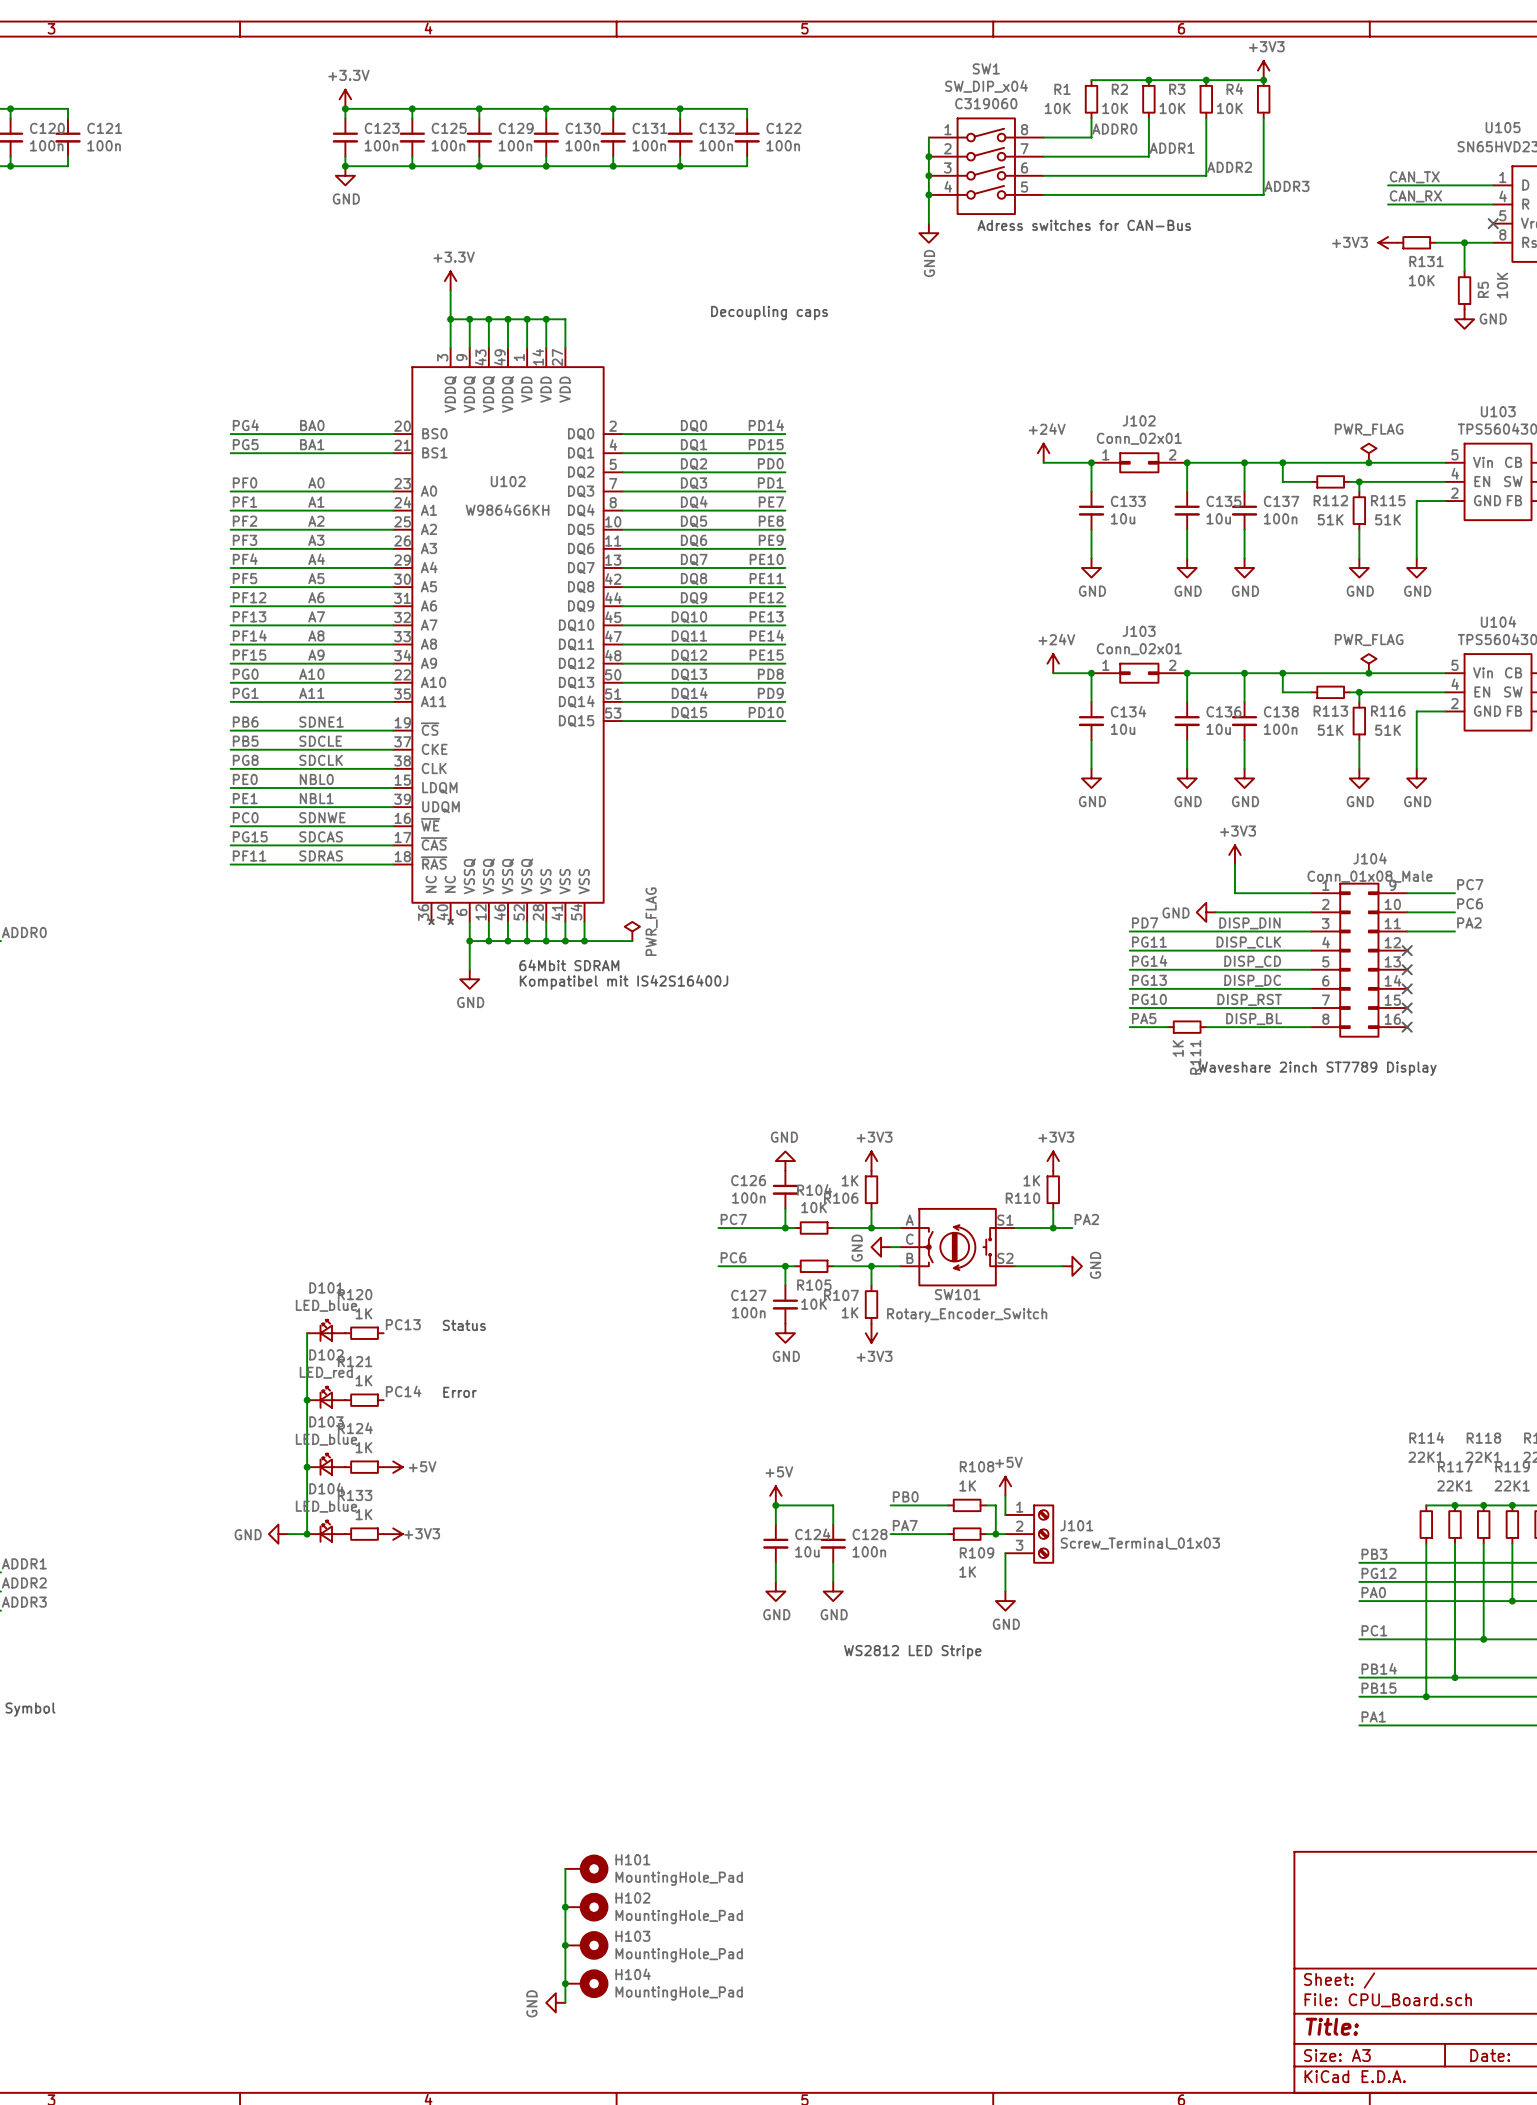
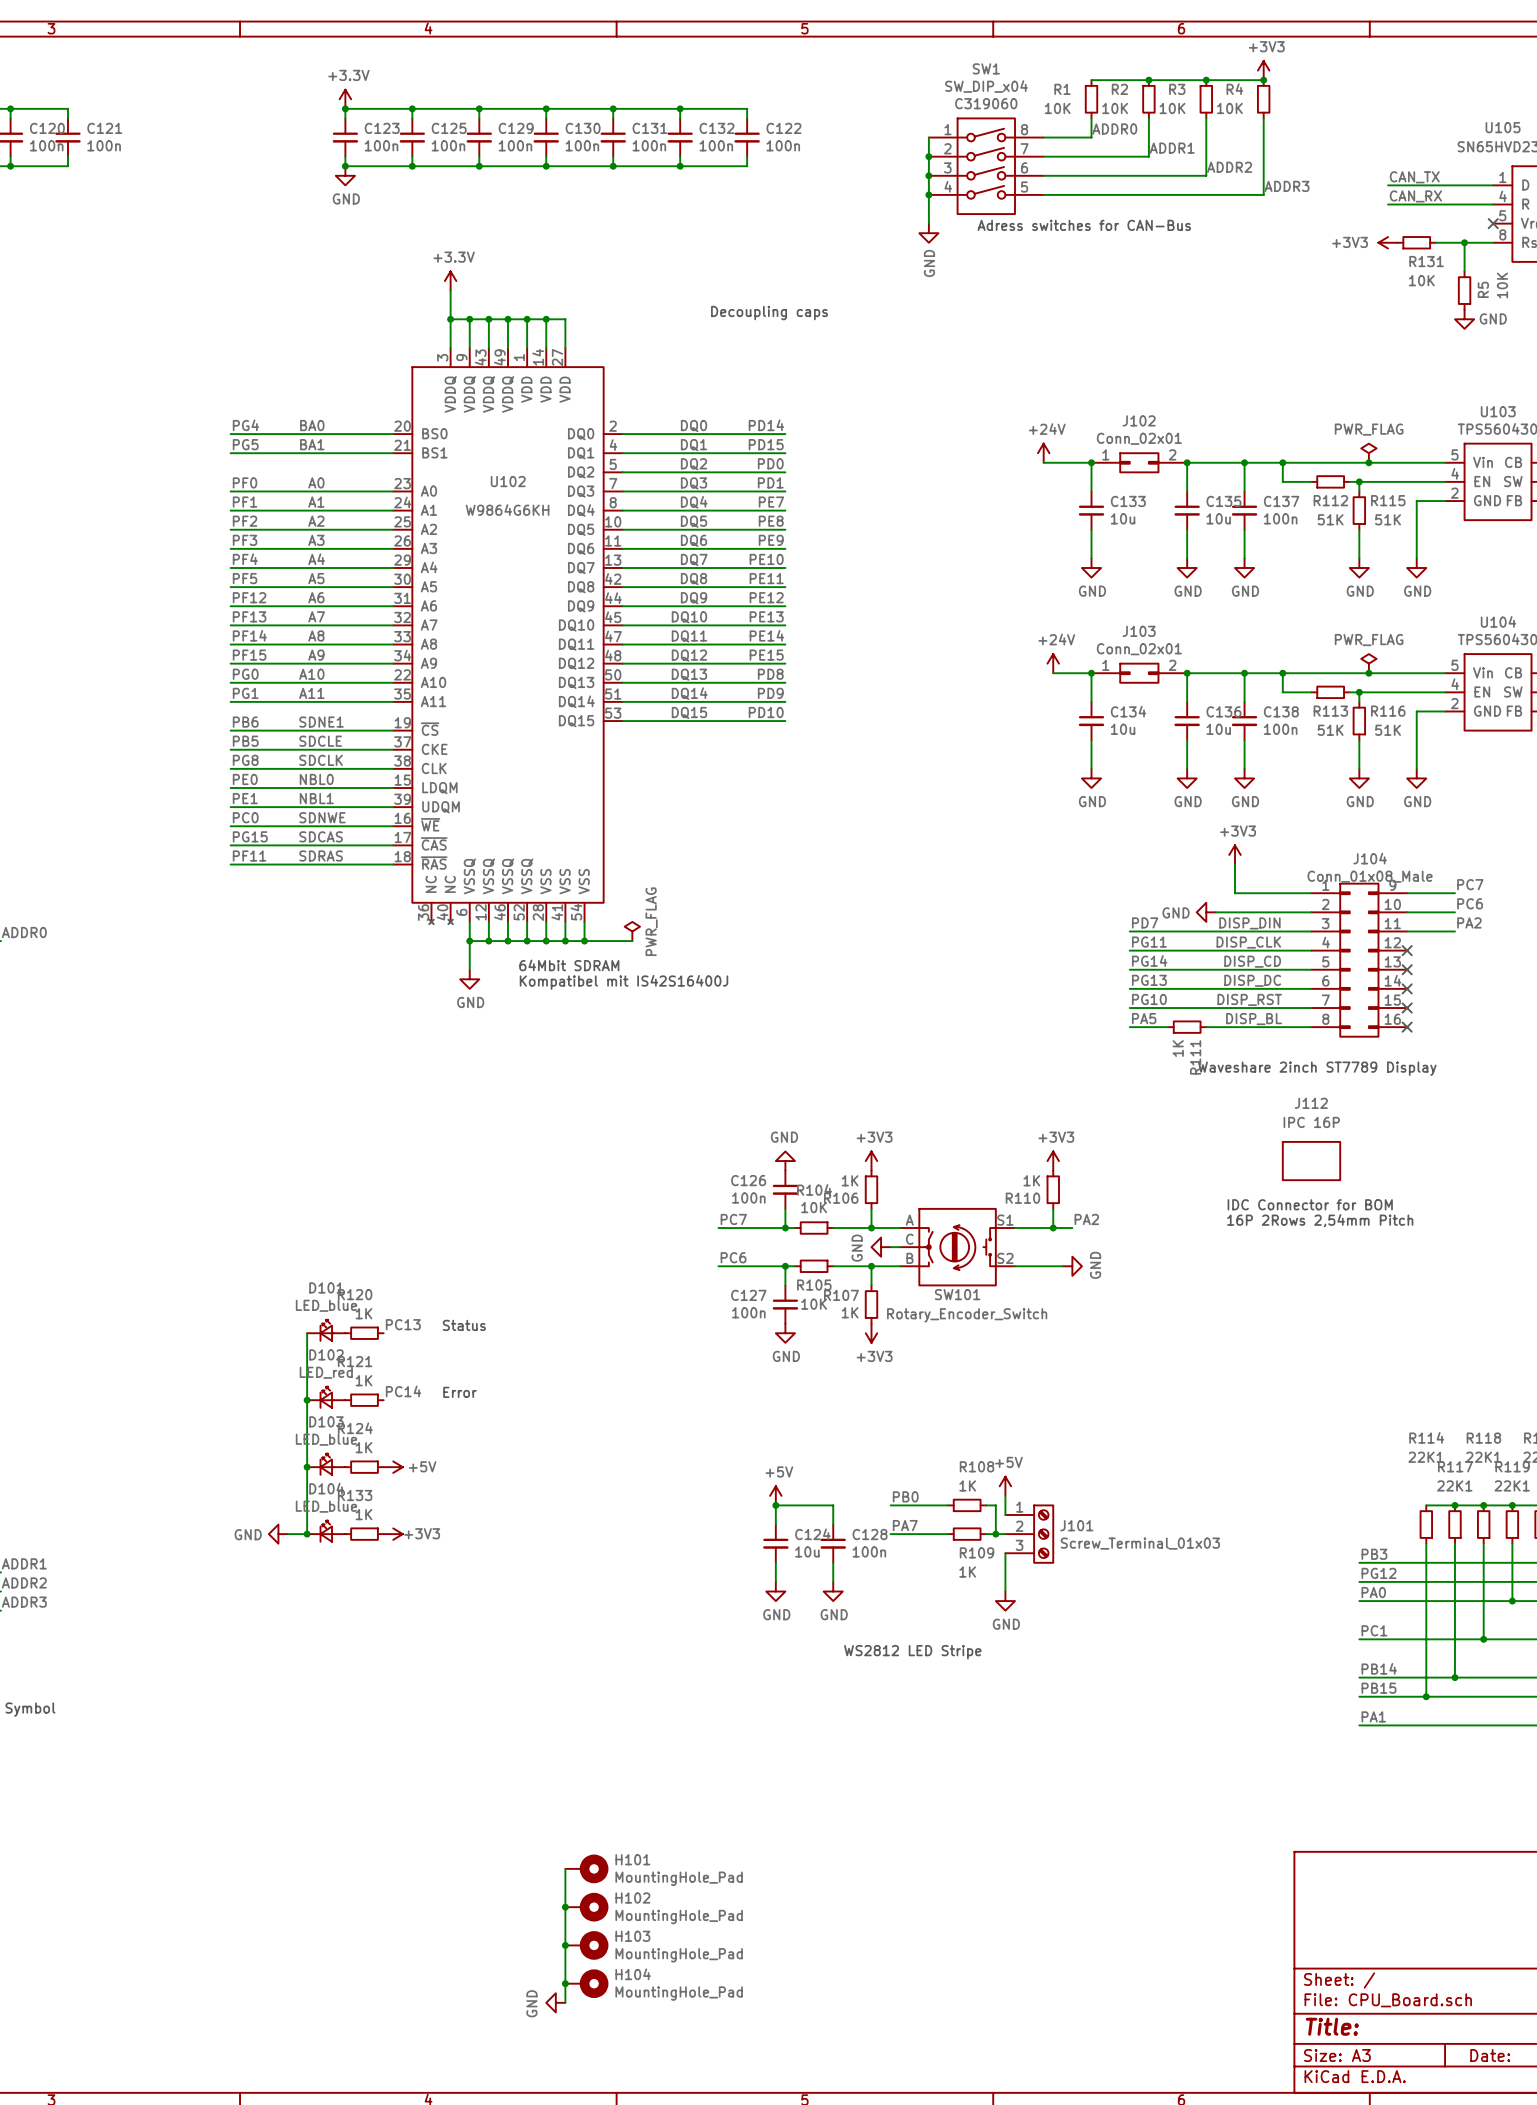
J112: none -> IPC 16P (1311, 1161)
text: none -> IDC Connector for BOM (1310, 1204)
text: none -> 16P 2Rows 2,54mm Pitch (1320, 1220)

